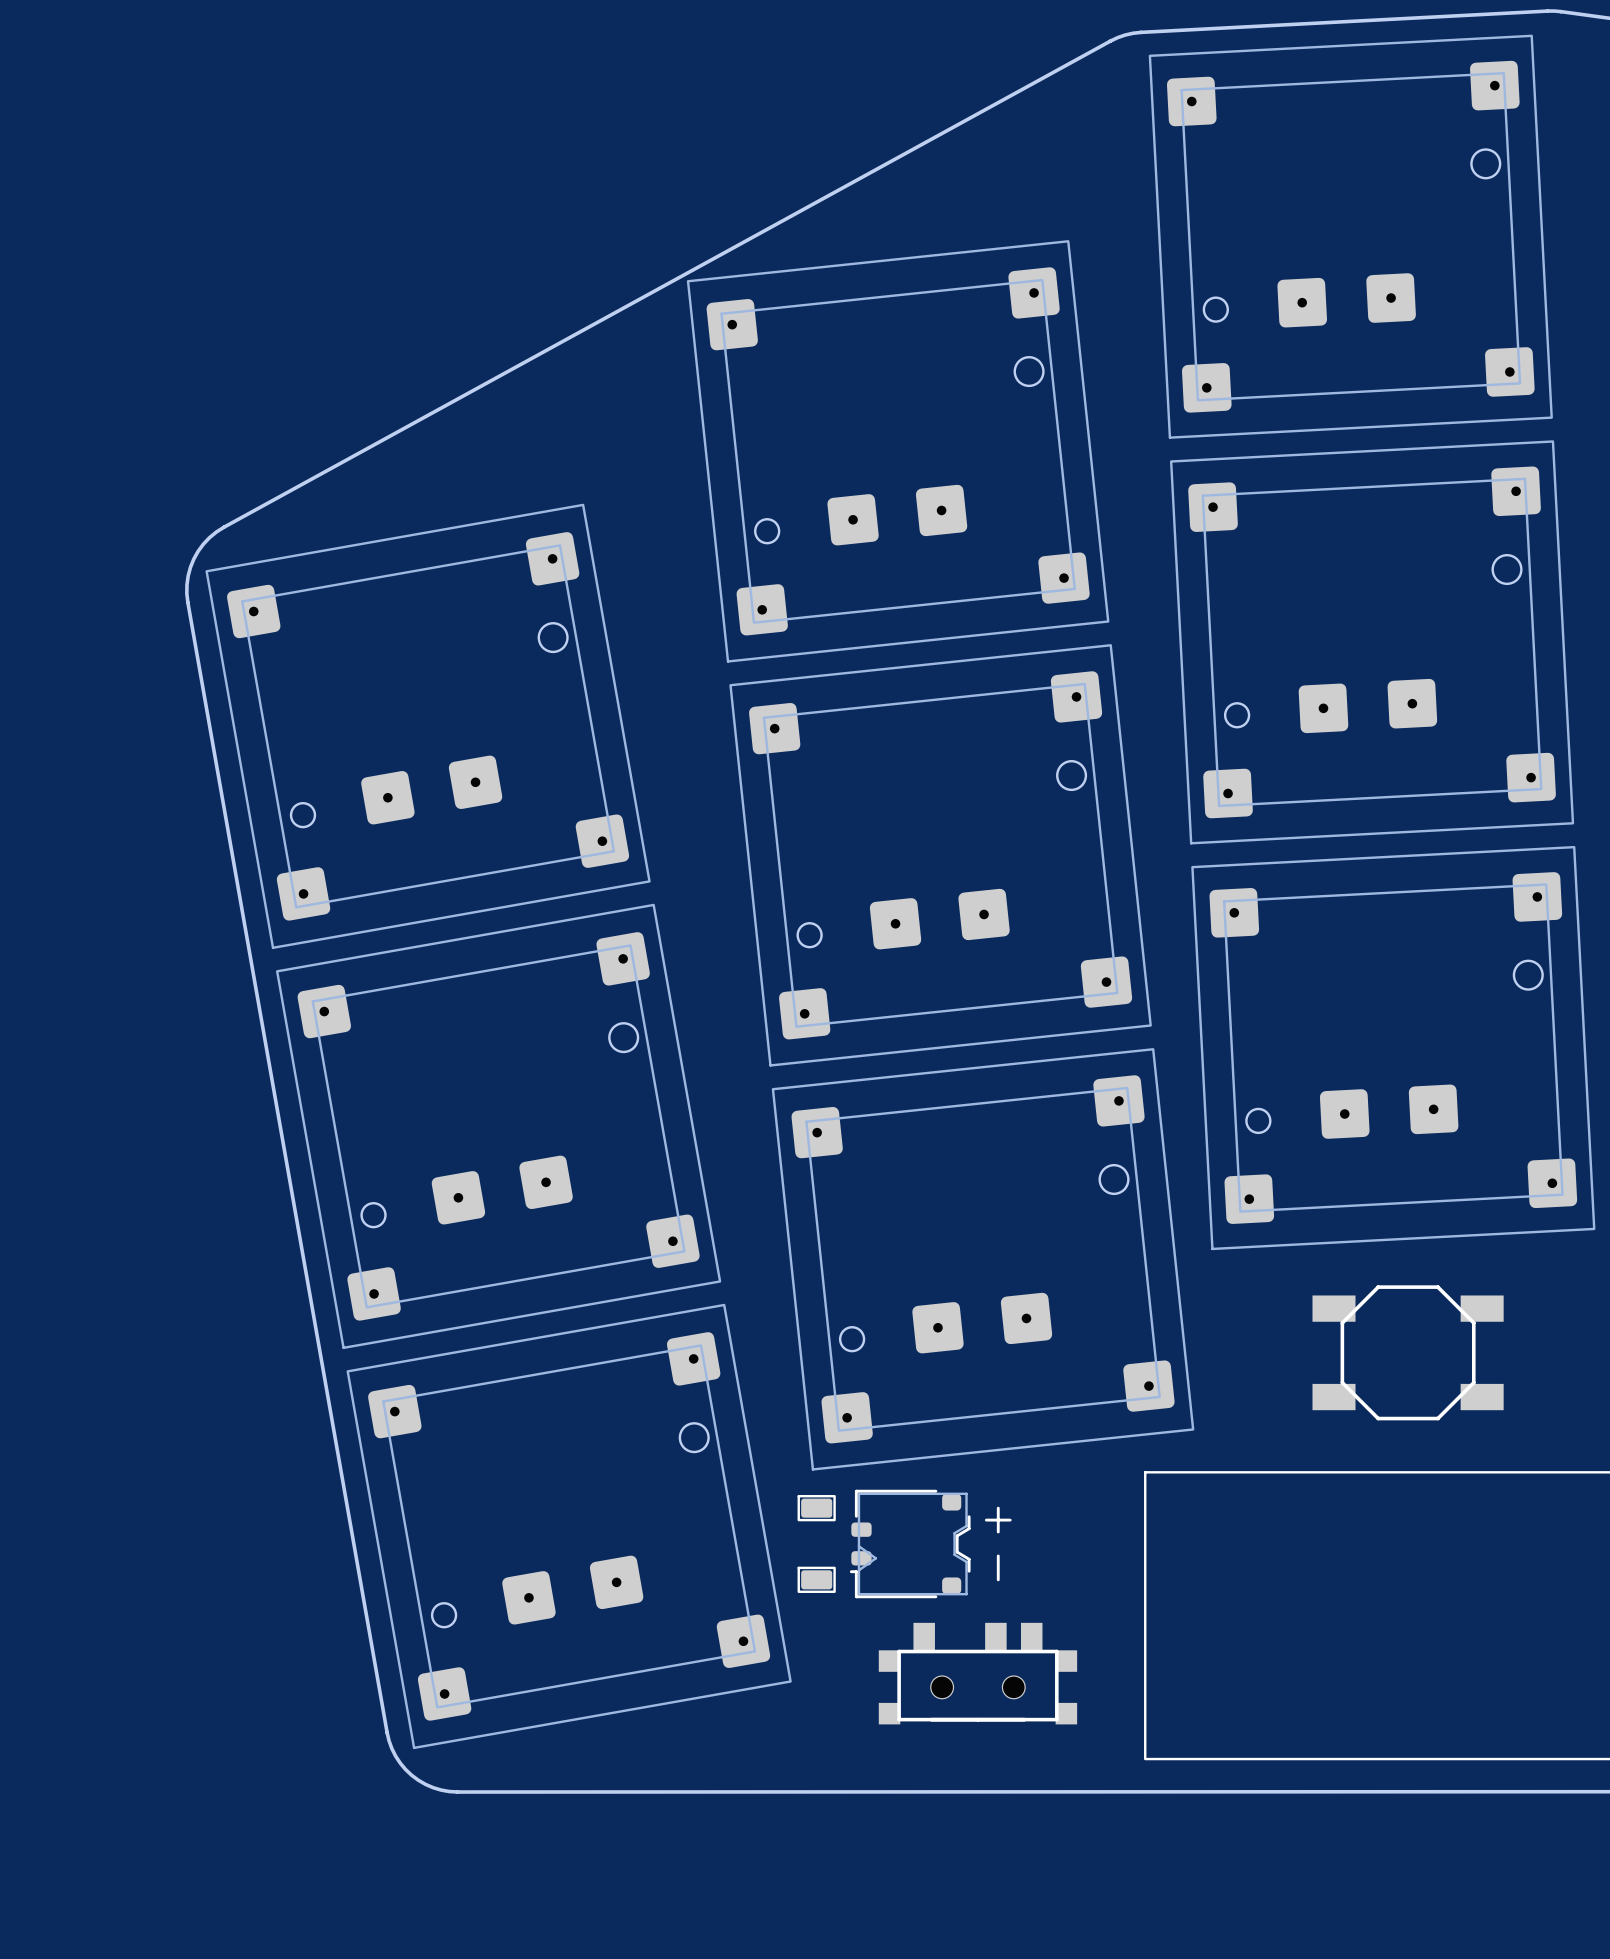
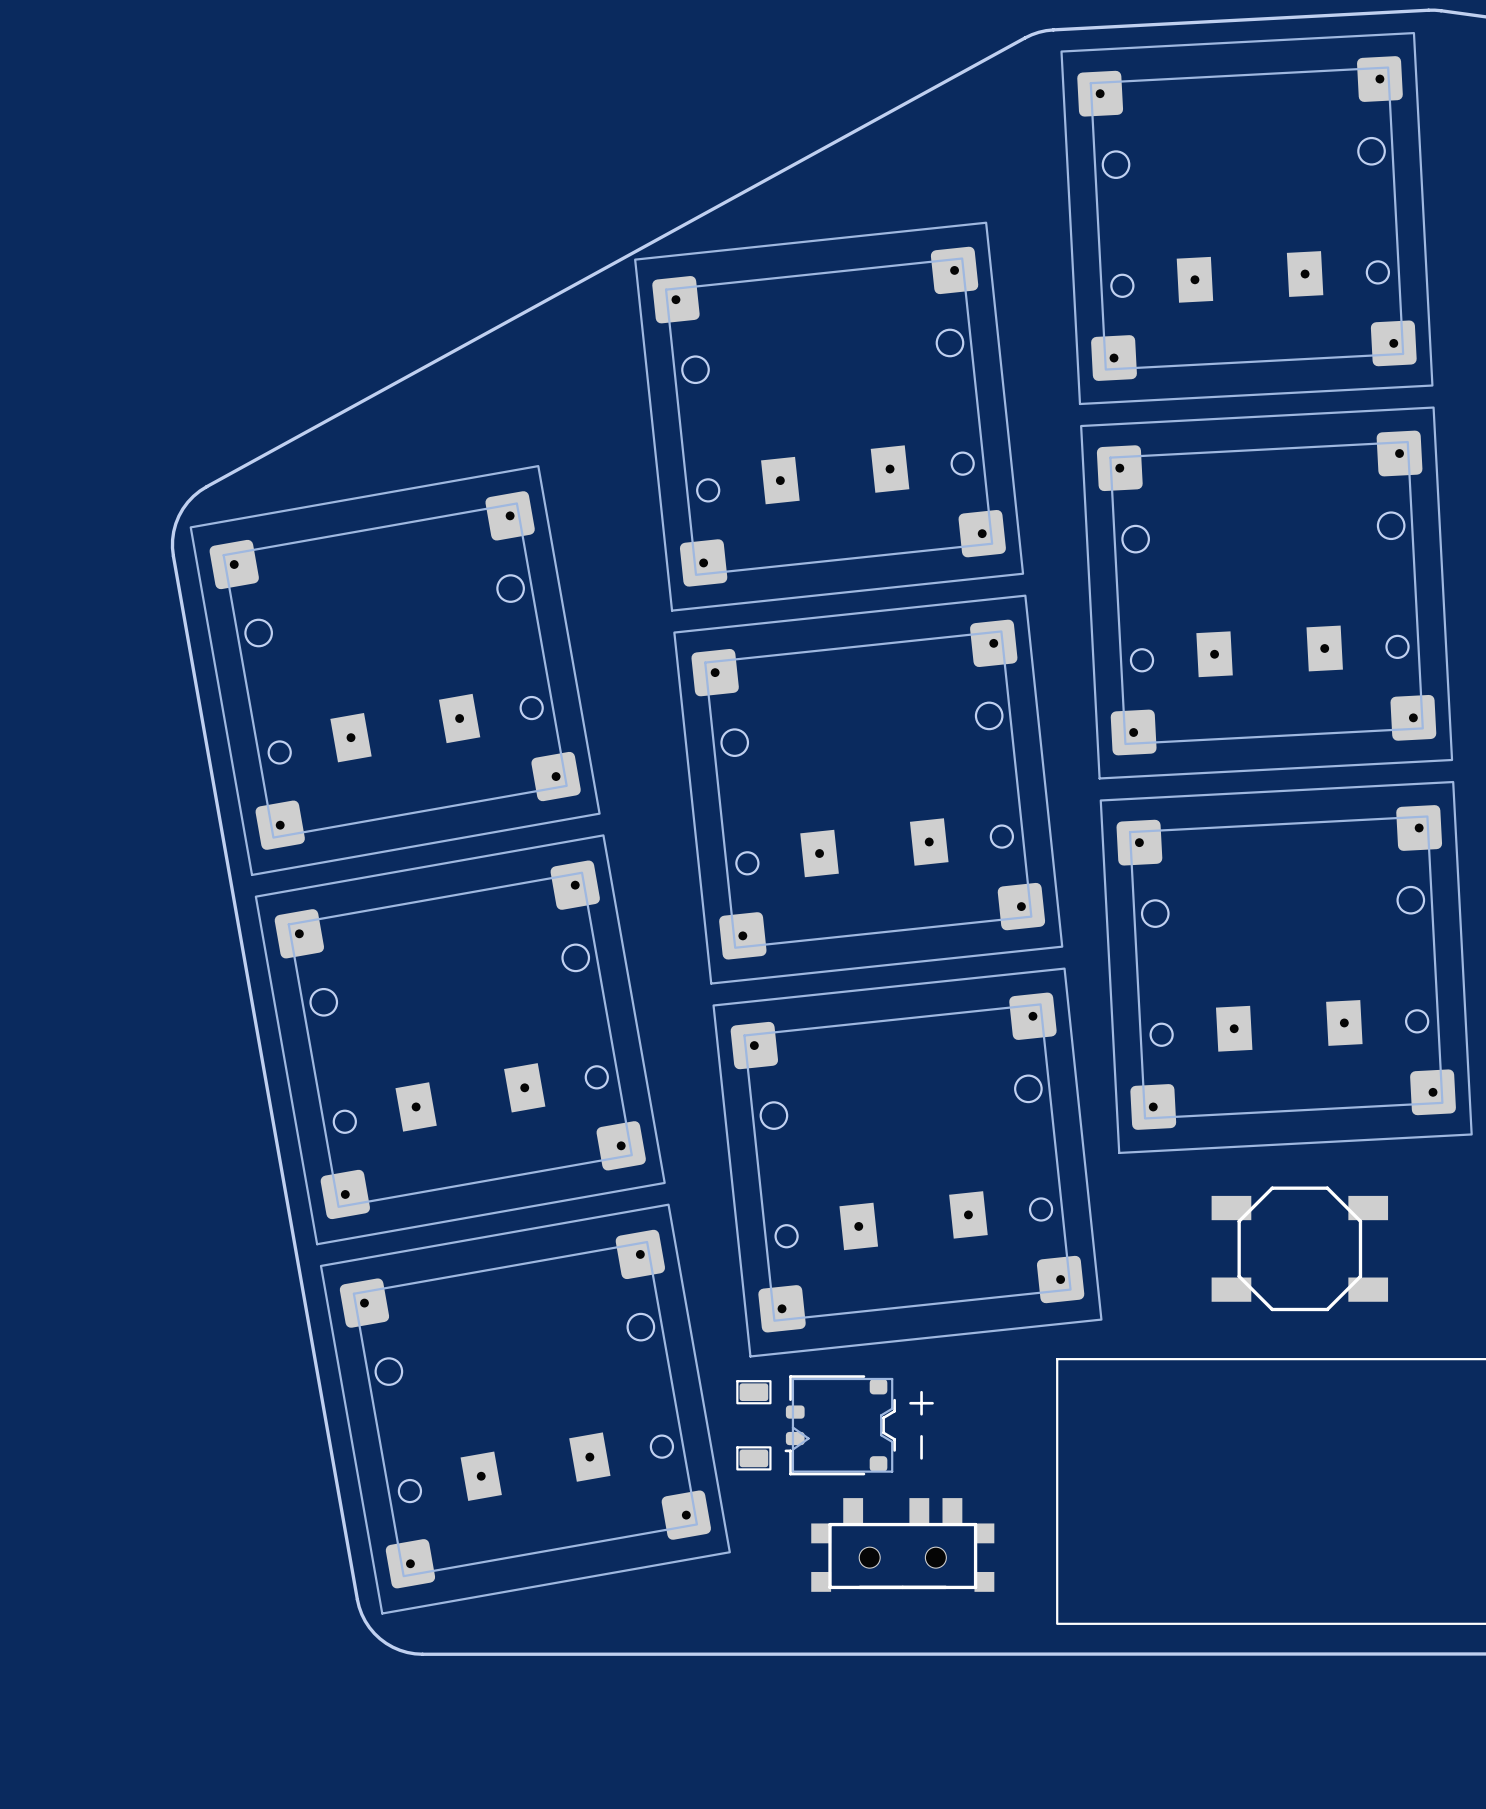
part footprint: [1148, 34, 1553, 439] -> [1060, 31, 1434, 406]
part footprint: [686, 240, 1110, 663] -> [634, 221, 1025, 612]
part footprint: [1169, 440, 1575, 845] -> [1080, 406, 1454, 780]
part footprint: [205, 503, 651, 950] -> [189, 464, 601, 877]
part footprint: [729, 644, 1152, 1067] -> [673, 594, 1064, 985]
part footprint: [1191, 845, 1596, 1251] -> [1099, 780, 1473, 1155]
part footprint: [275, 903, 722, 1350] -> [254, 834, 666, 1246]
part footprint: [771, 1048, 1195, 1471] -> [712, 967, 1103, 1358]
part footprint: [346, 1303, 792, 1750] -> [319, 1203, 731, 1615]

